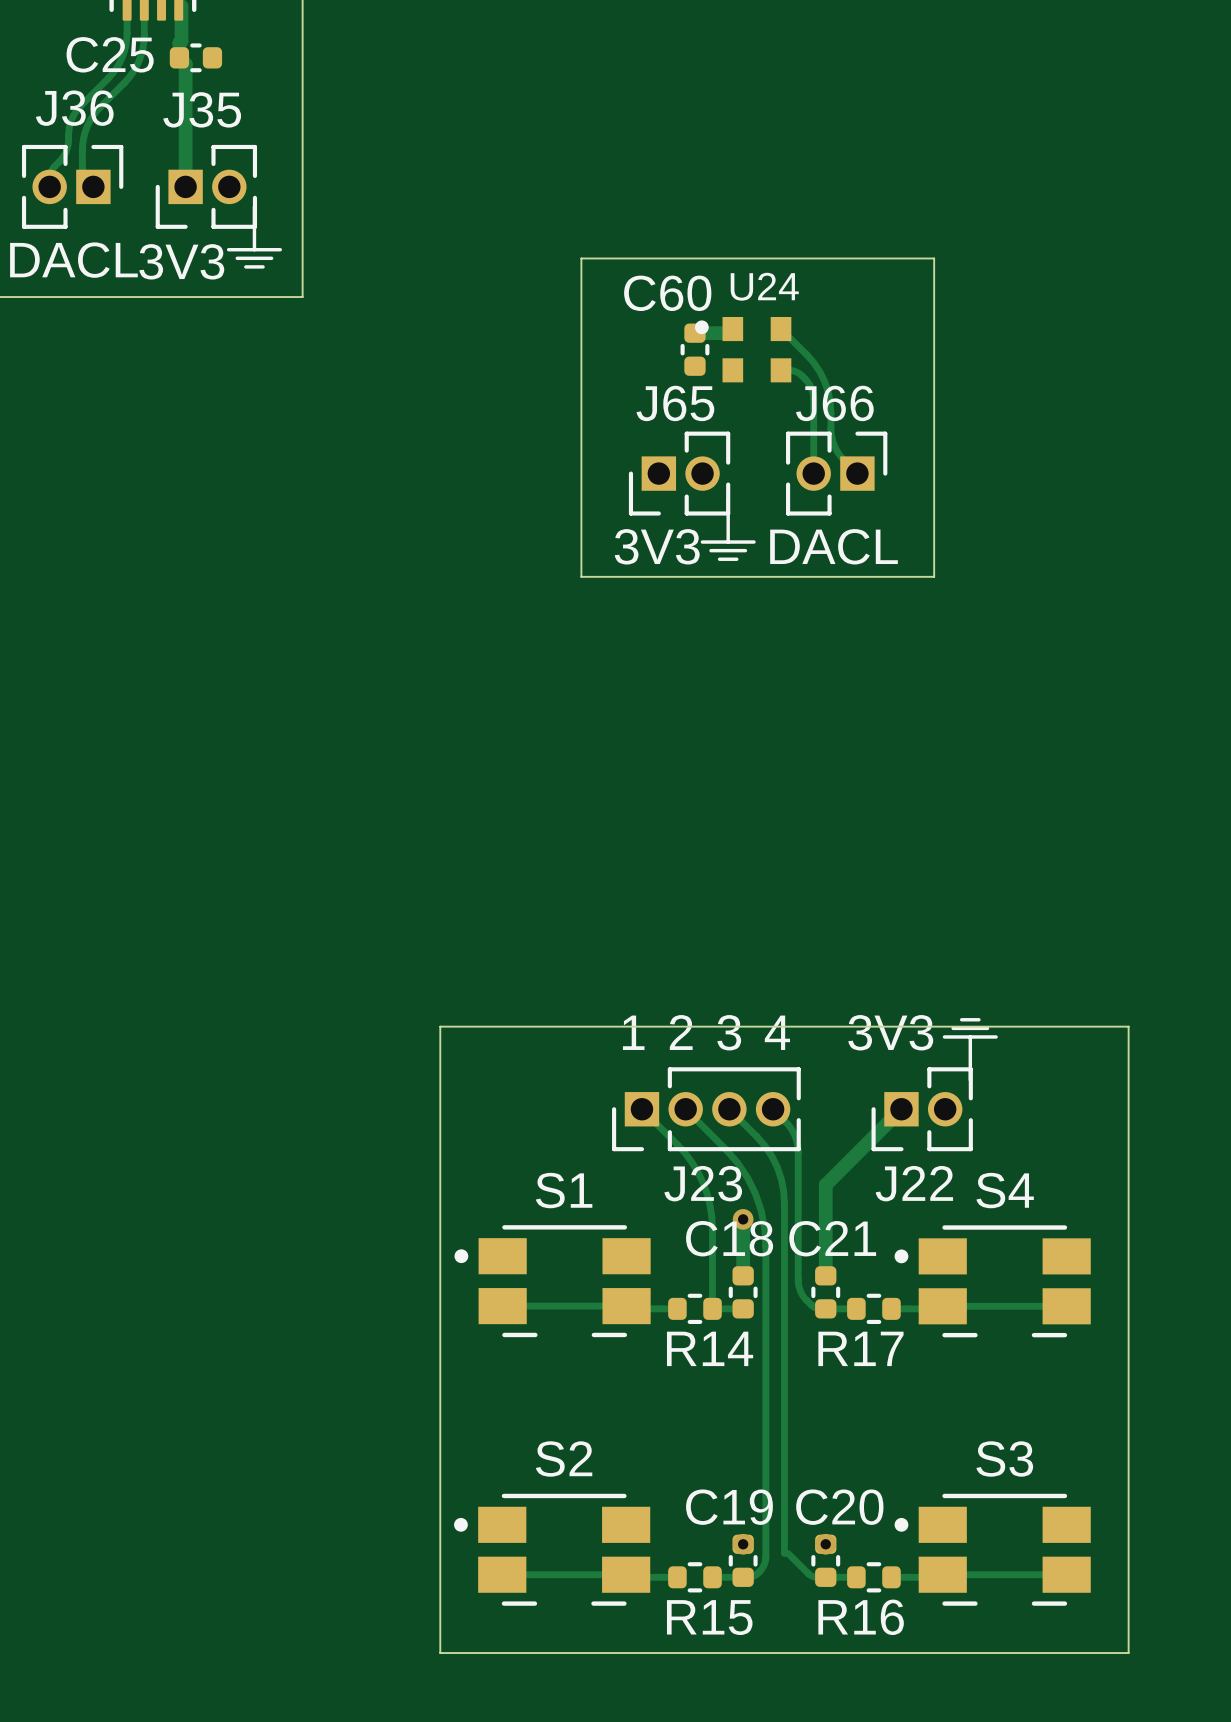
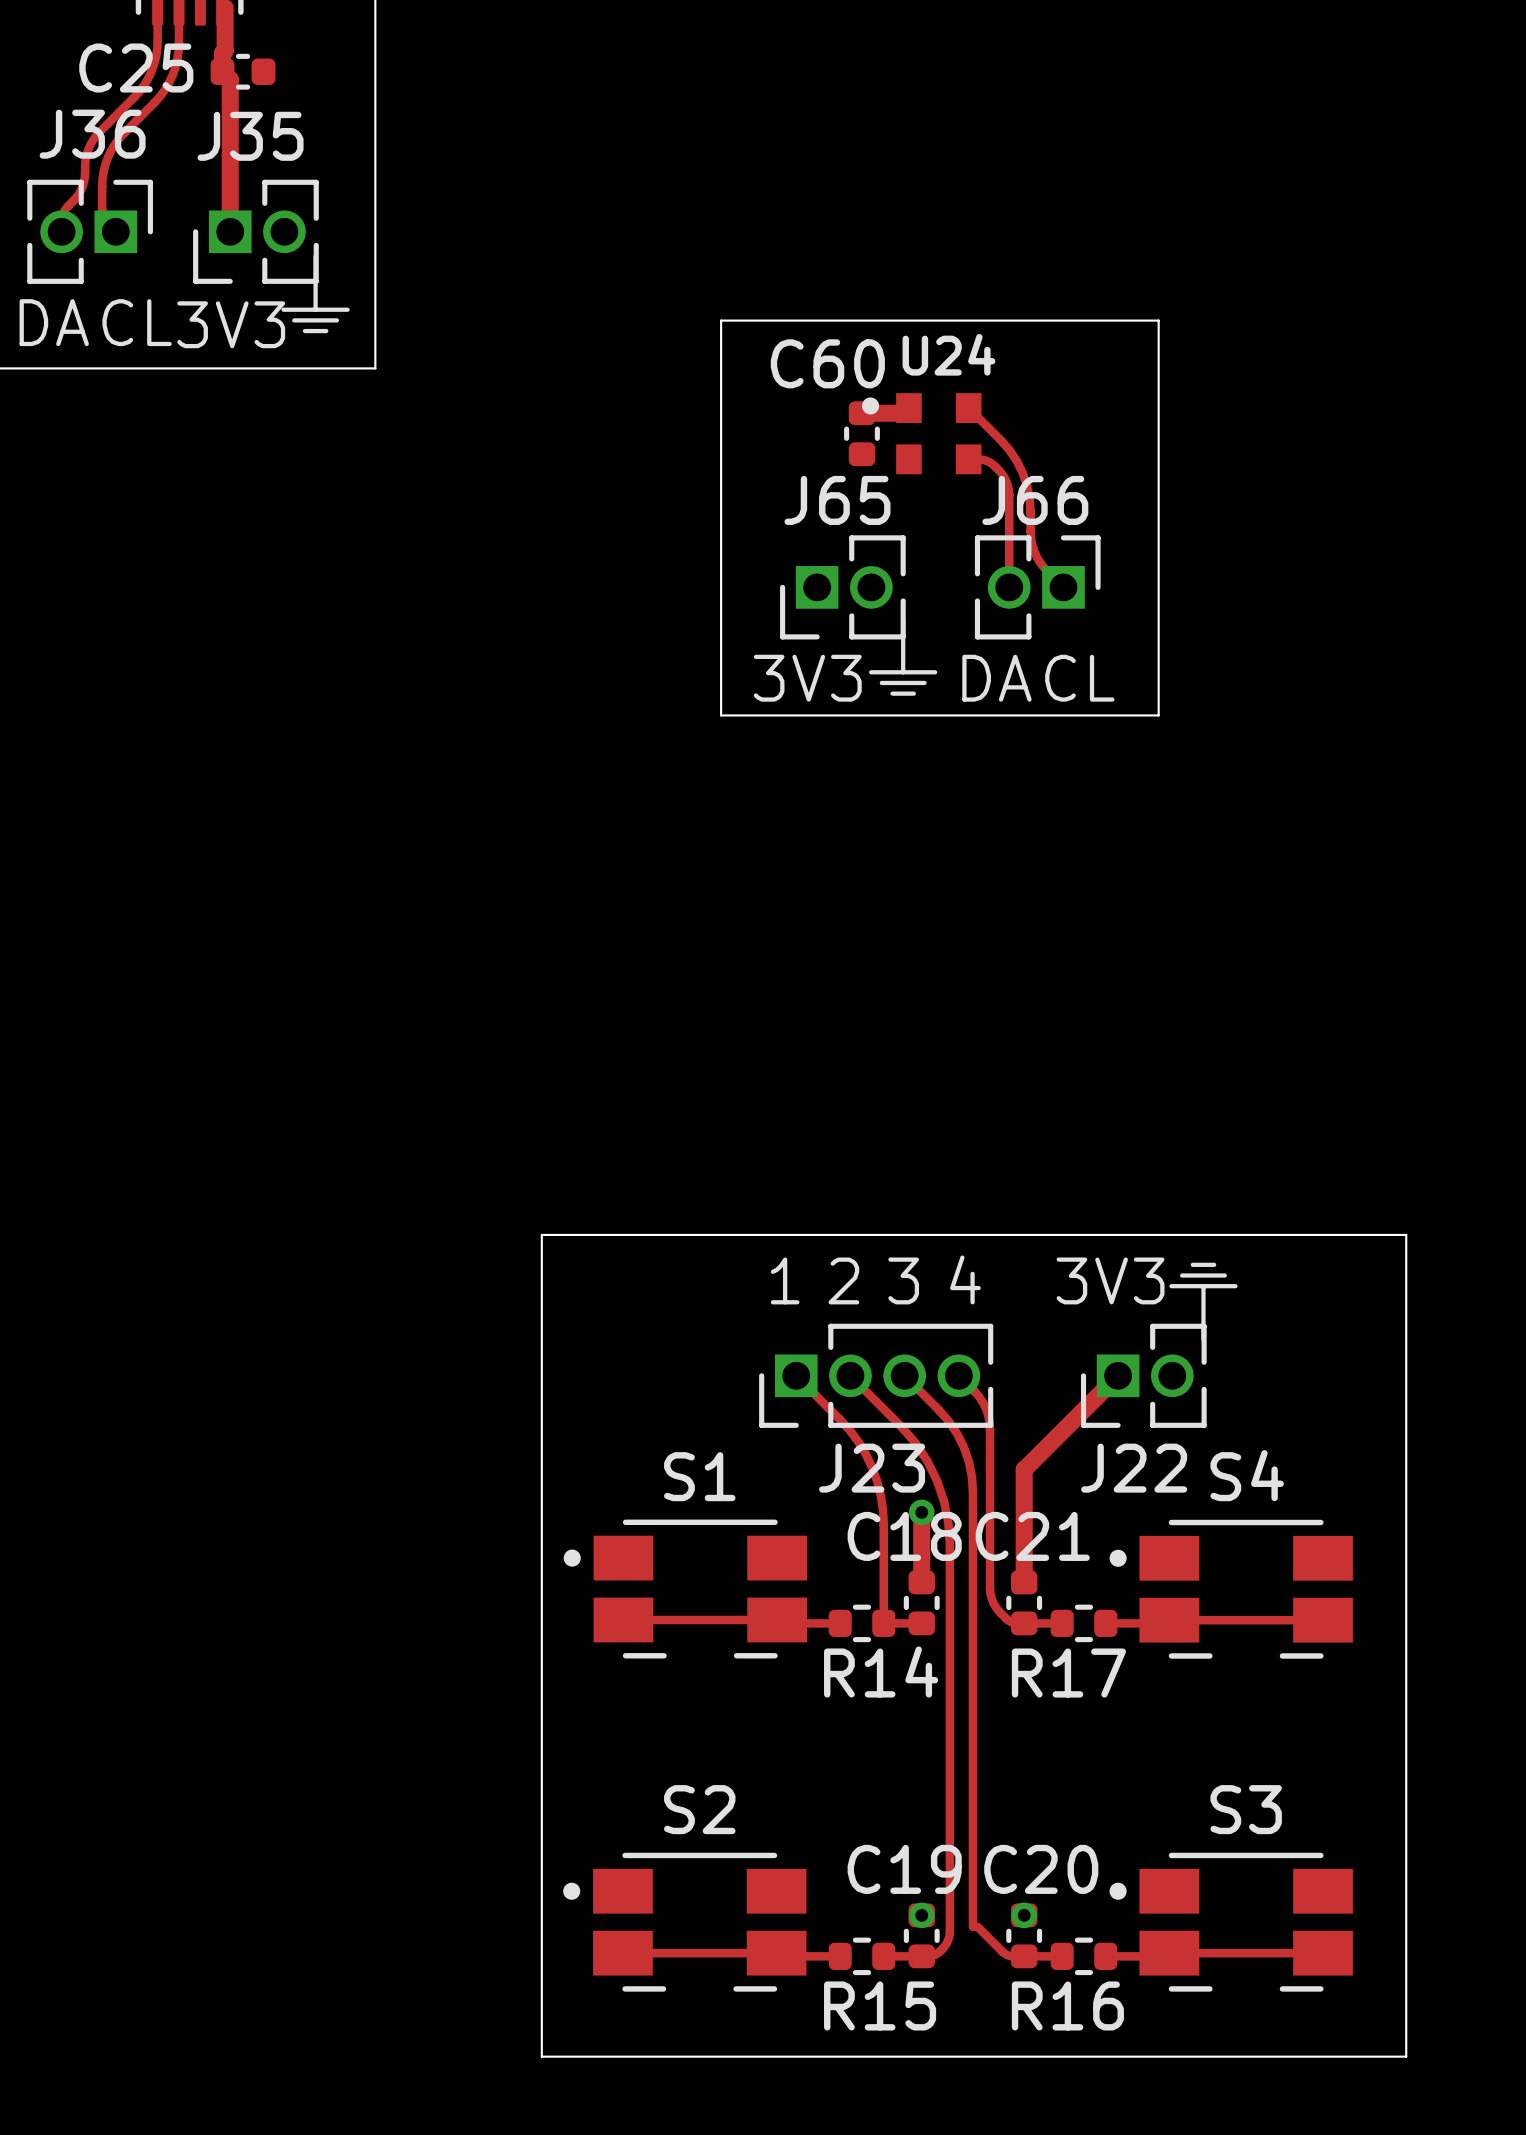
board edge: (440, 1026) (1128, 1026) (1128, 1653) (440, 1653) (440, 1026) -> (541, 1234) (541, 2056) (1406, 2056) (1406, 1234) (541, 1234)

